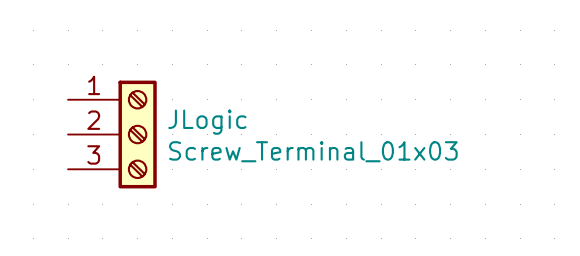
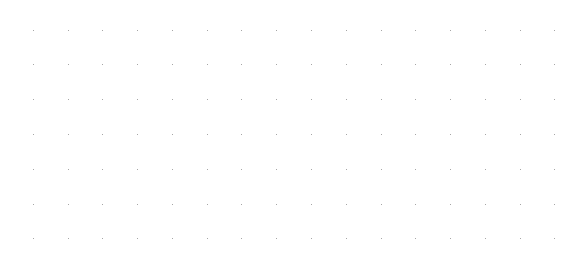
JLogic: Screw_Terminal_01x03 (112, 134) -> none

